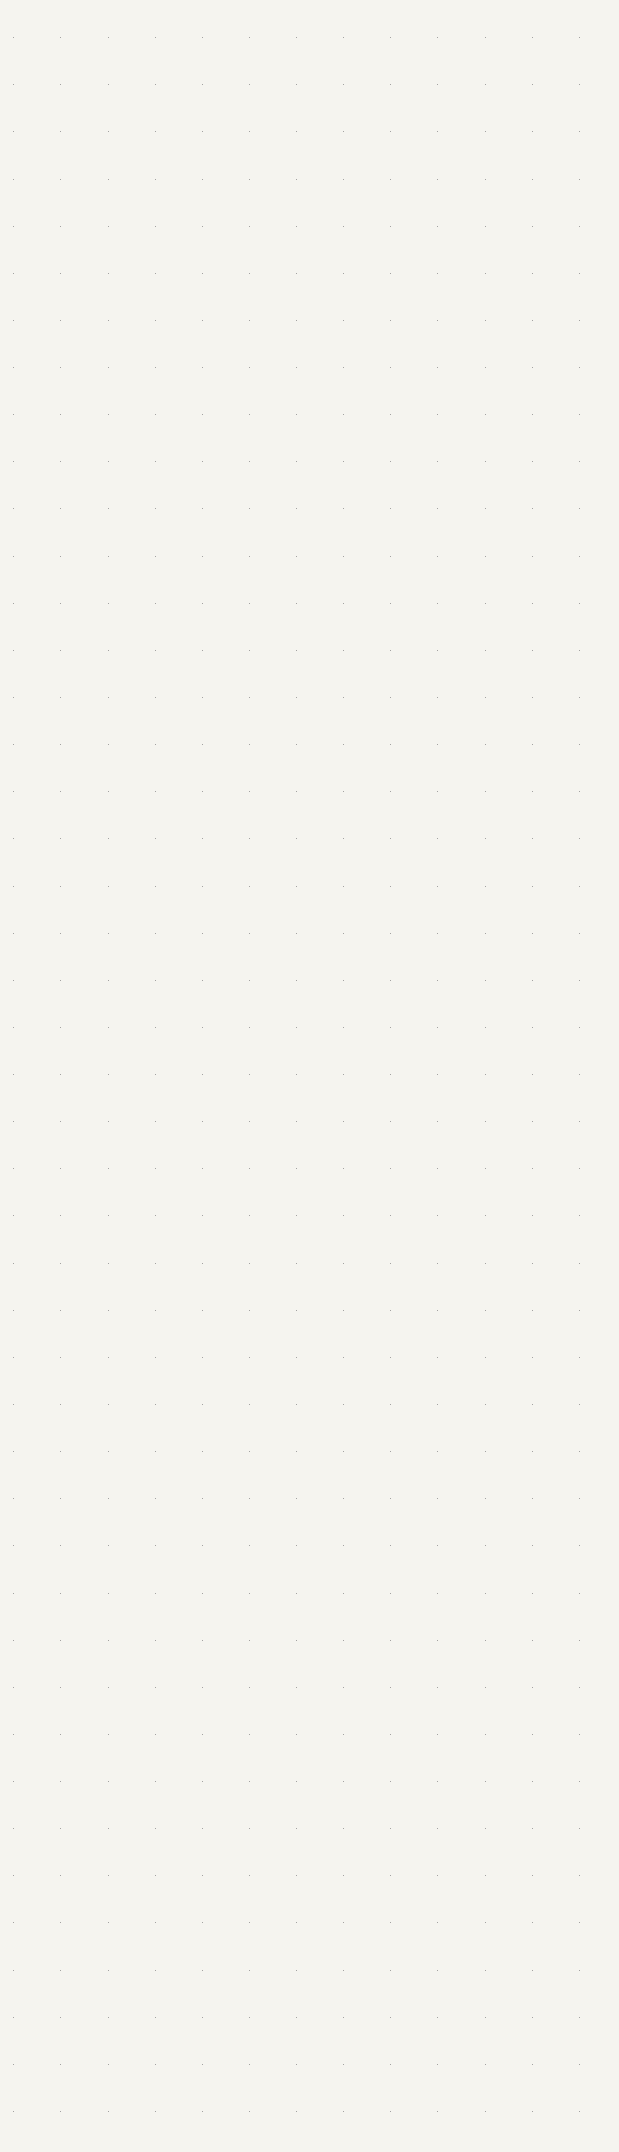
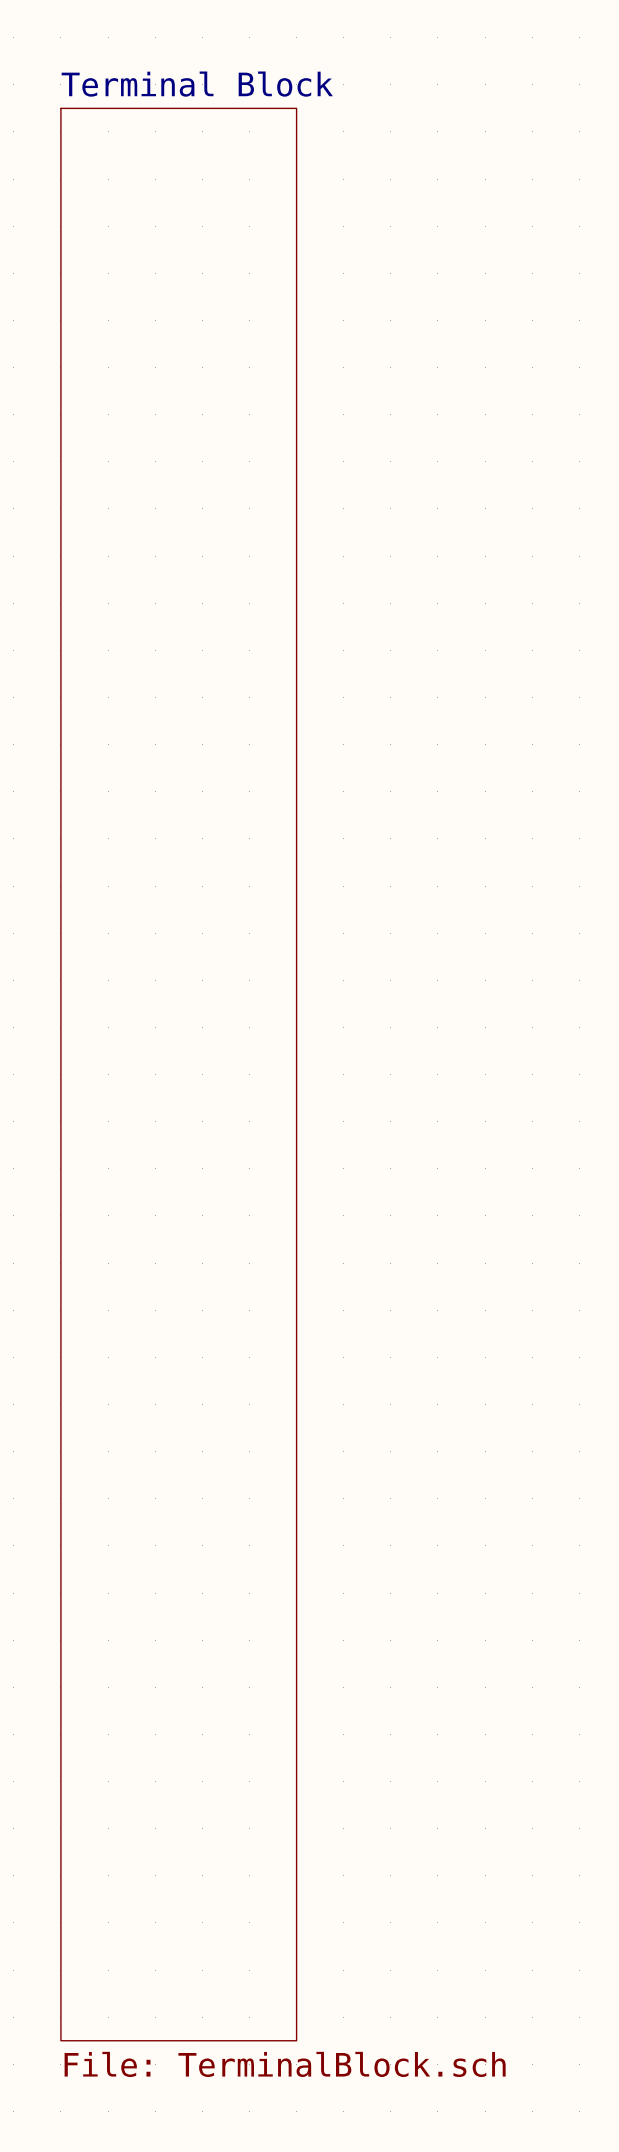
sheet Terminal Block: none -> File: TerminalBlock.sch (178, 1074)

